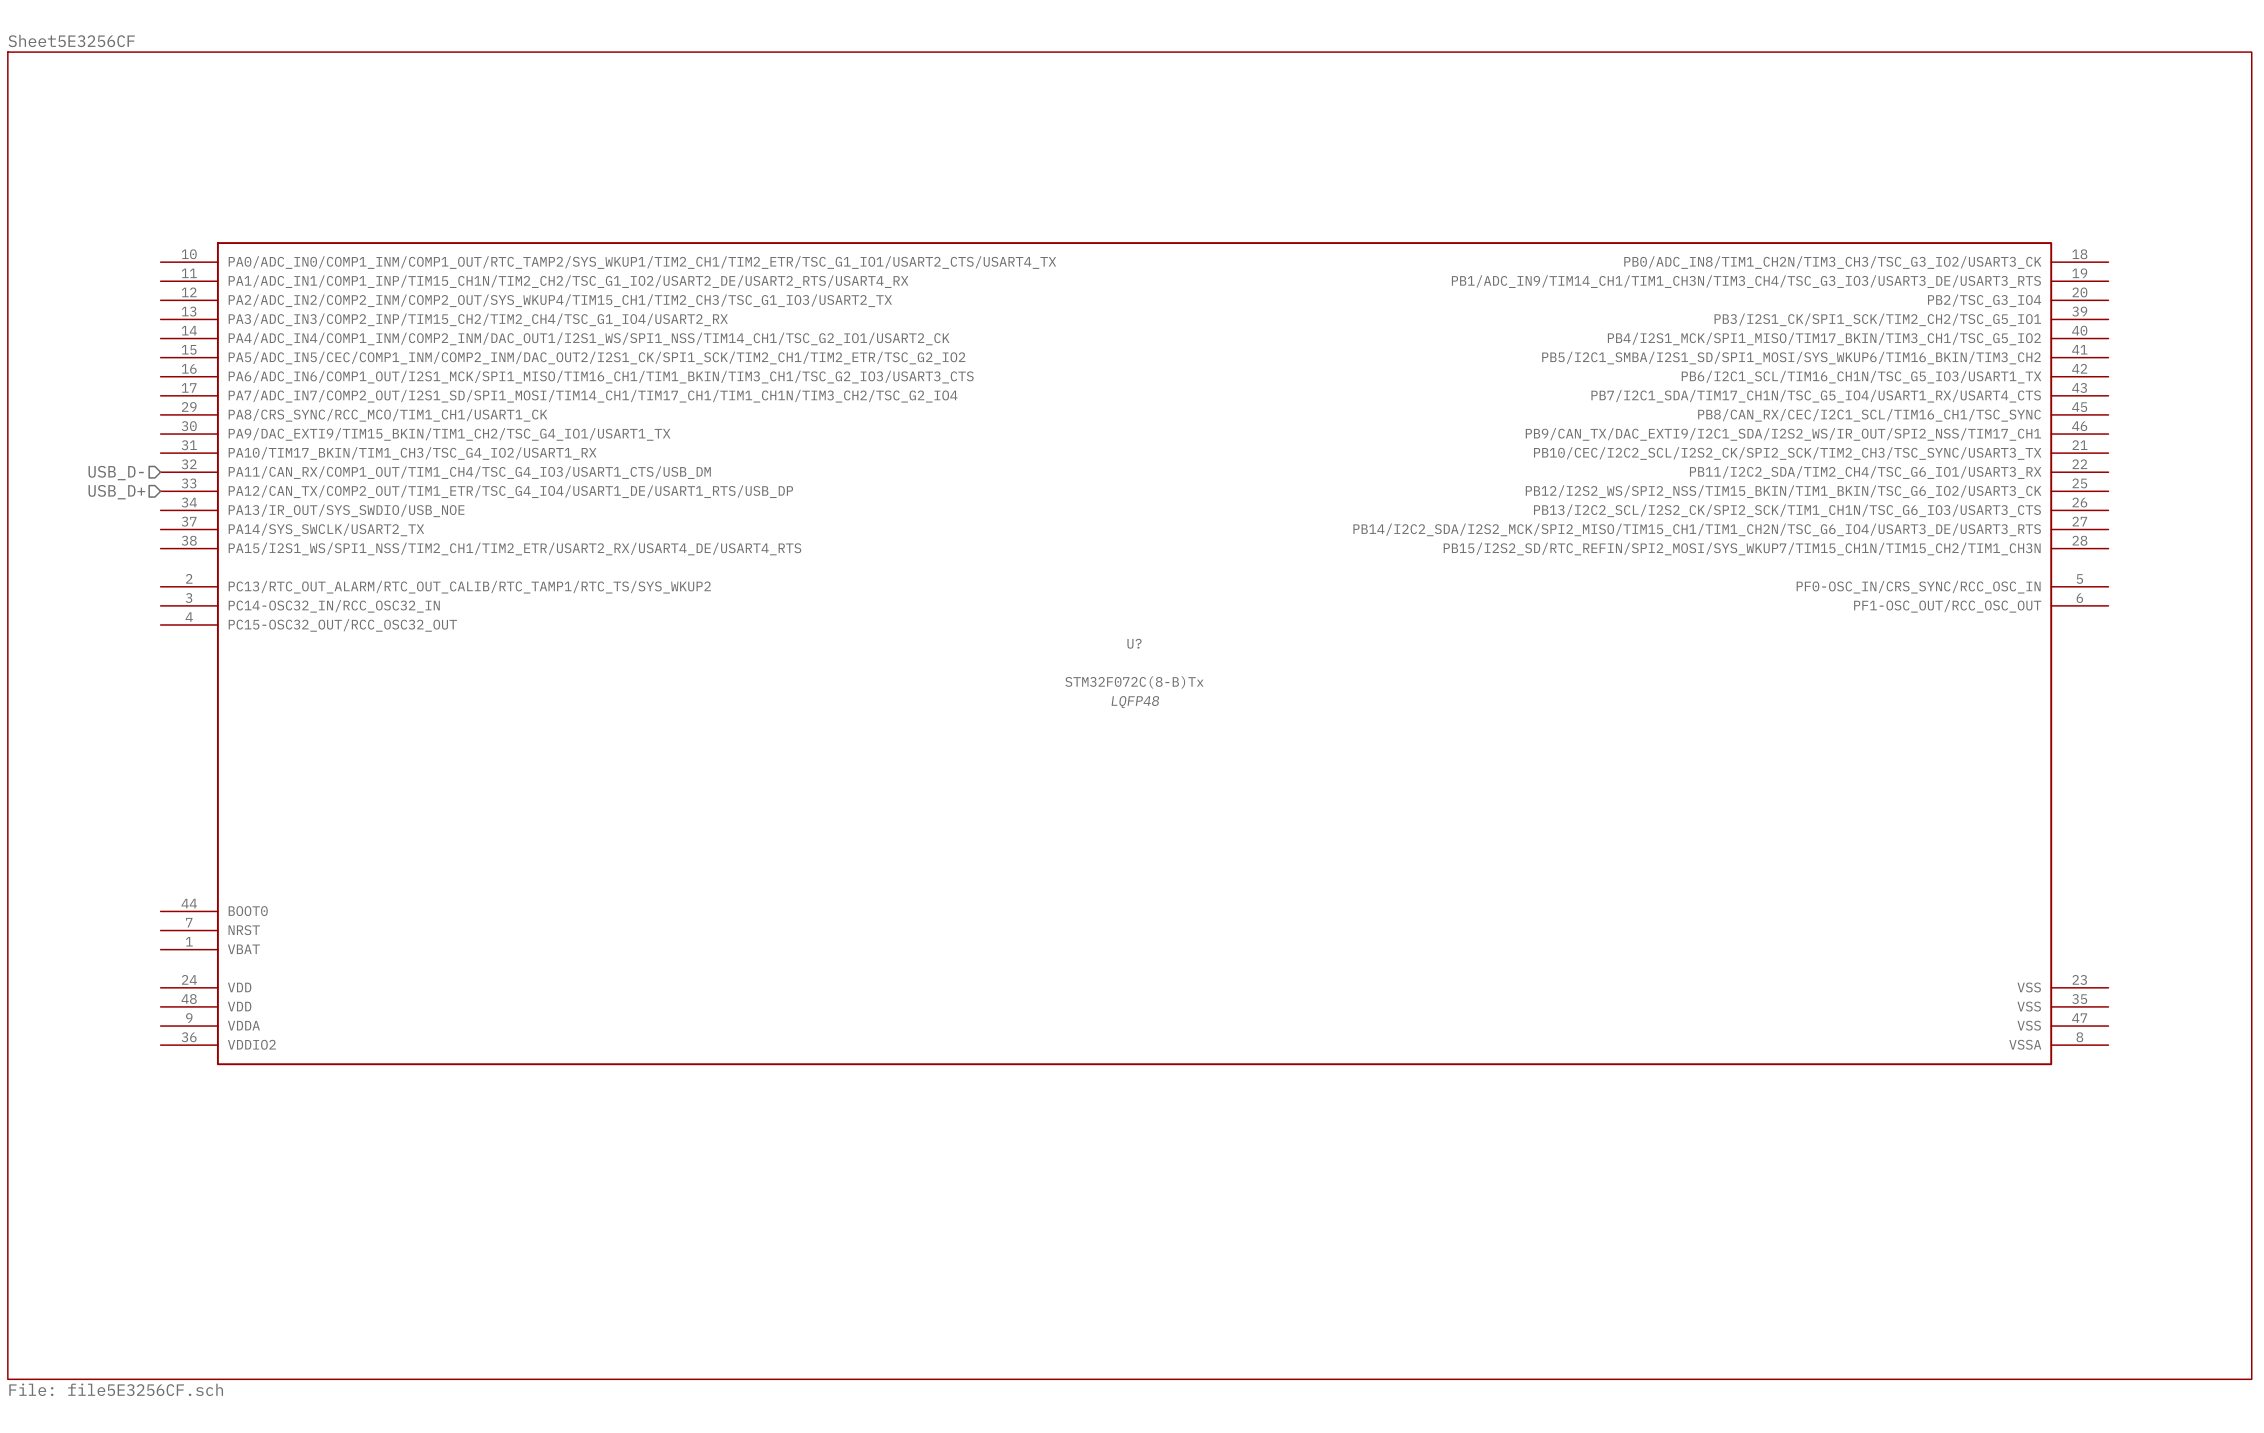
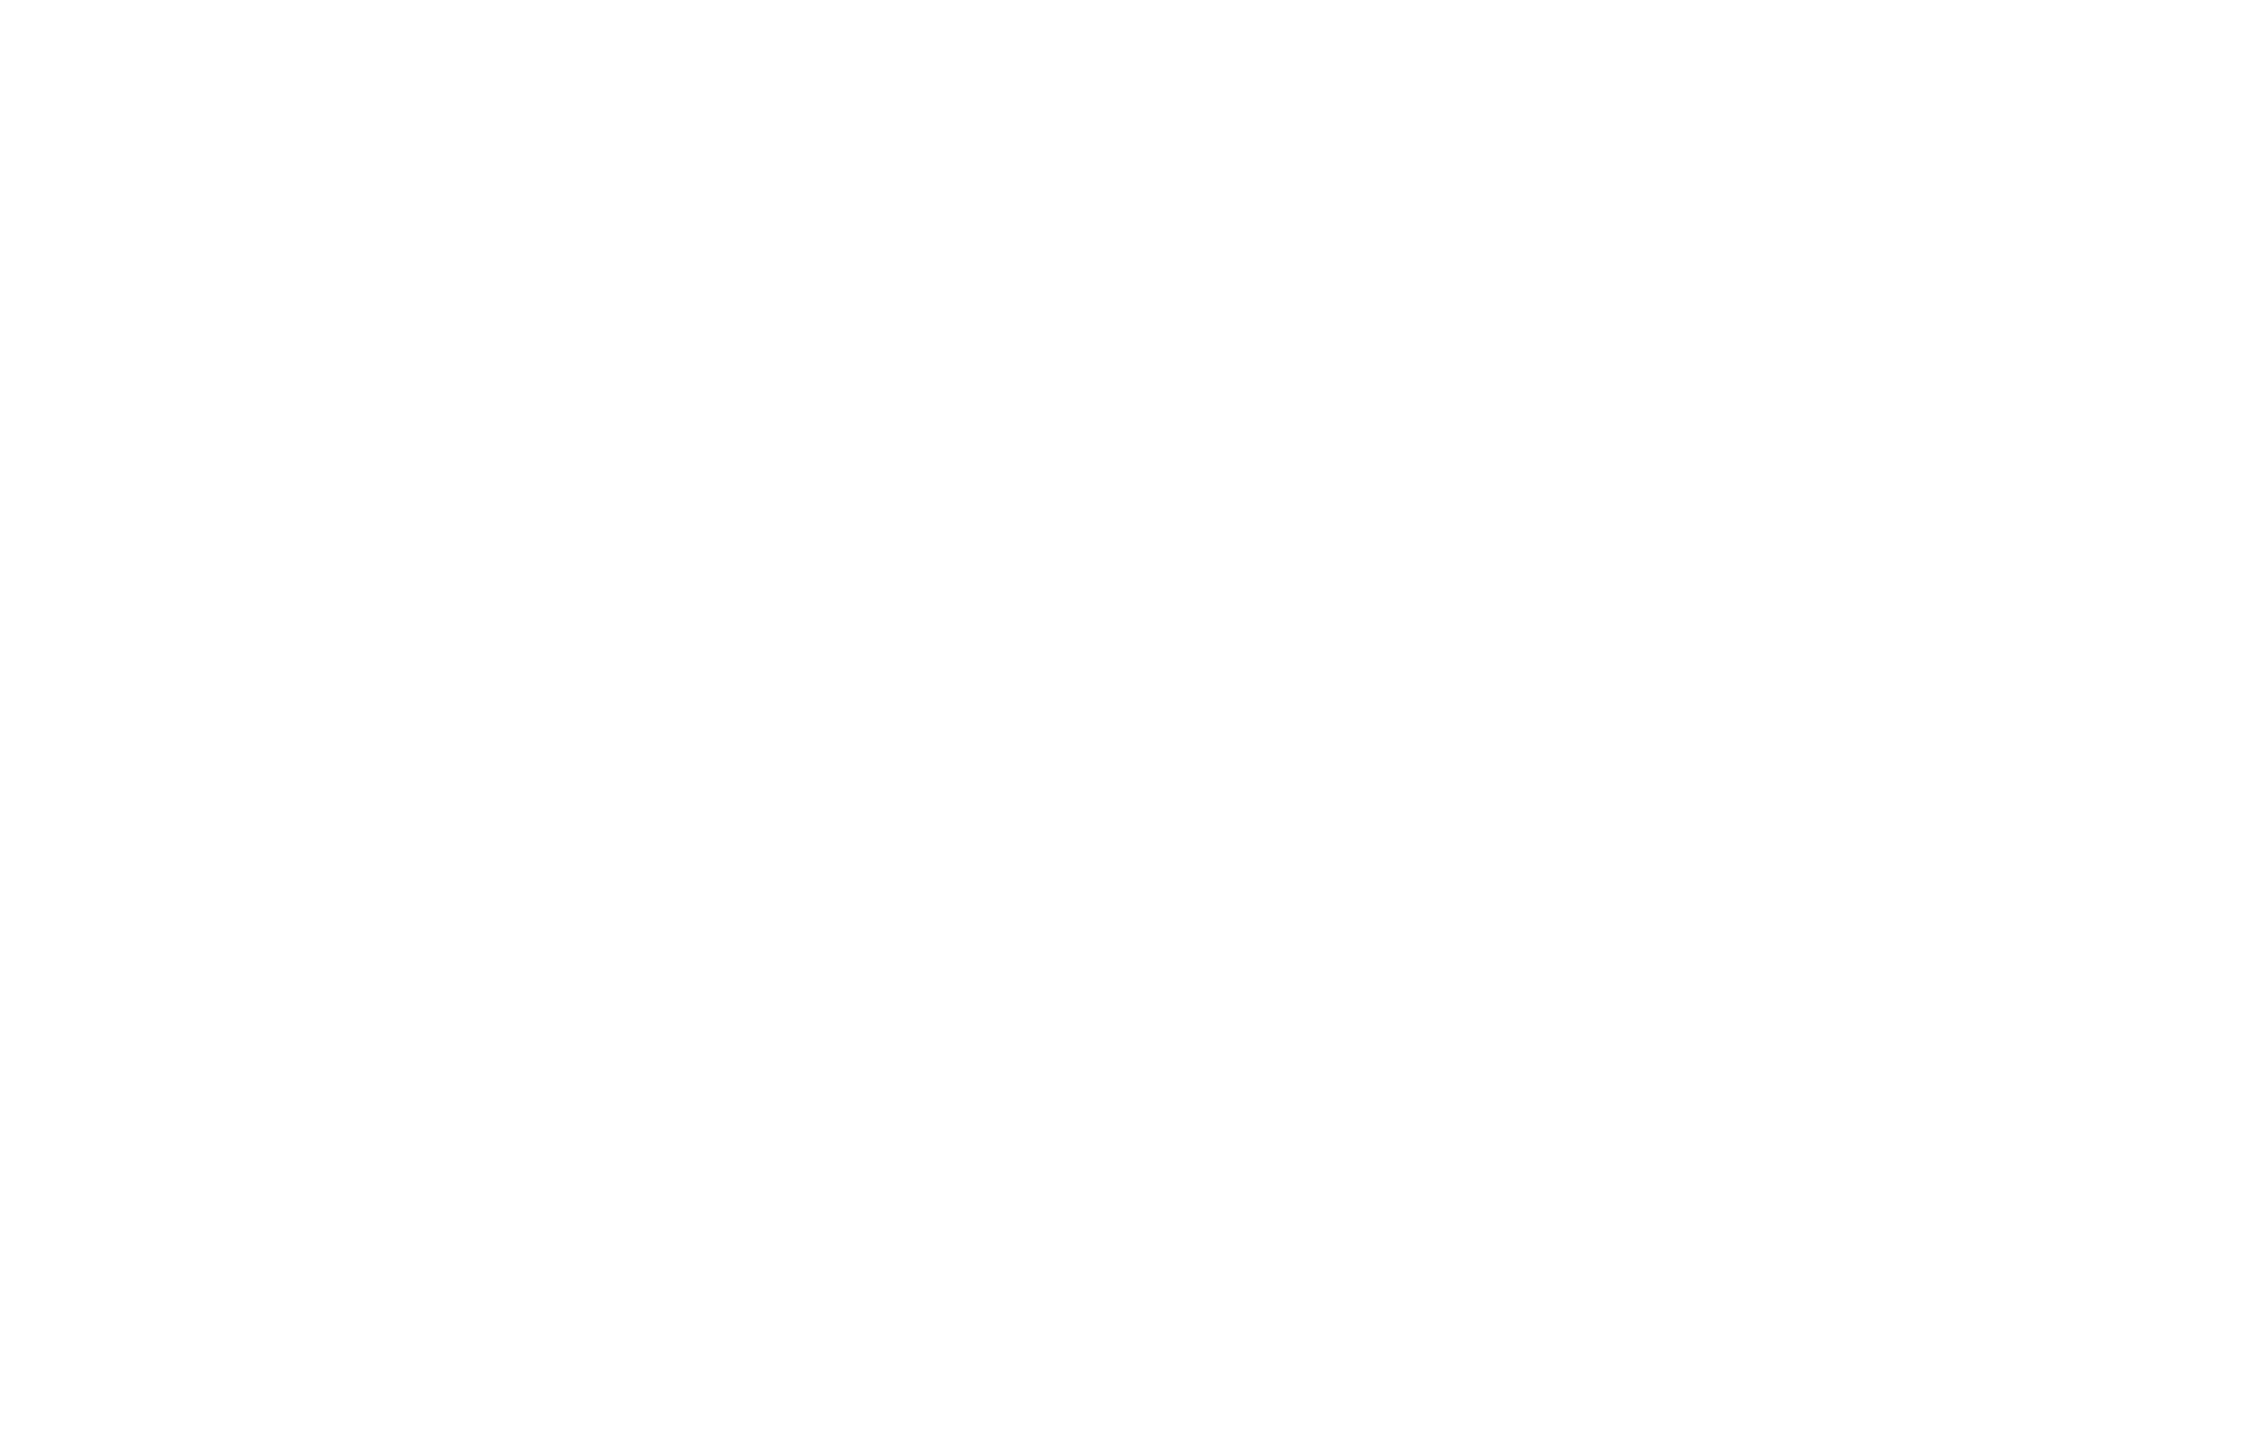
hierarchical label: USB_D- (116, 473) -> none
hierarchical label: USB_D+ (116, 492) -> none
U?: STM32F072C(8-B)Tx (1134, 653) -> none
sheet Sheet5E3256CF: File: file5E3256CF.sch (1129, 715) -> none

